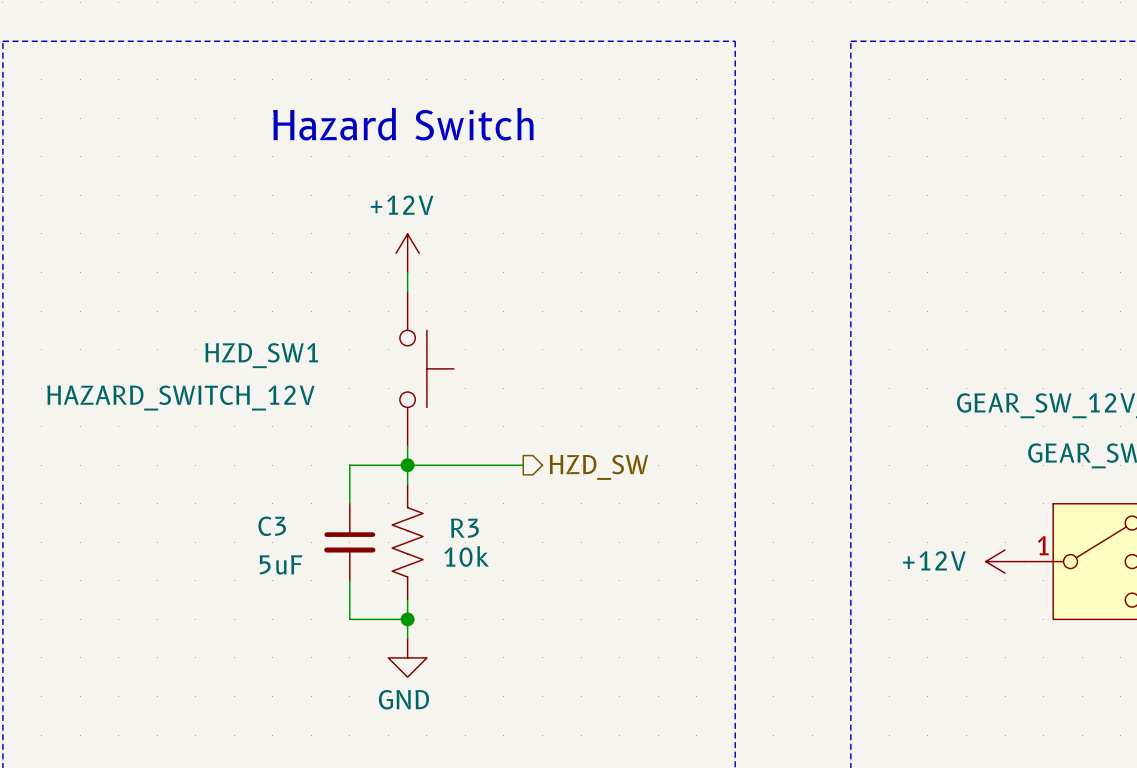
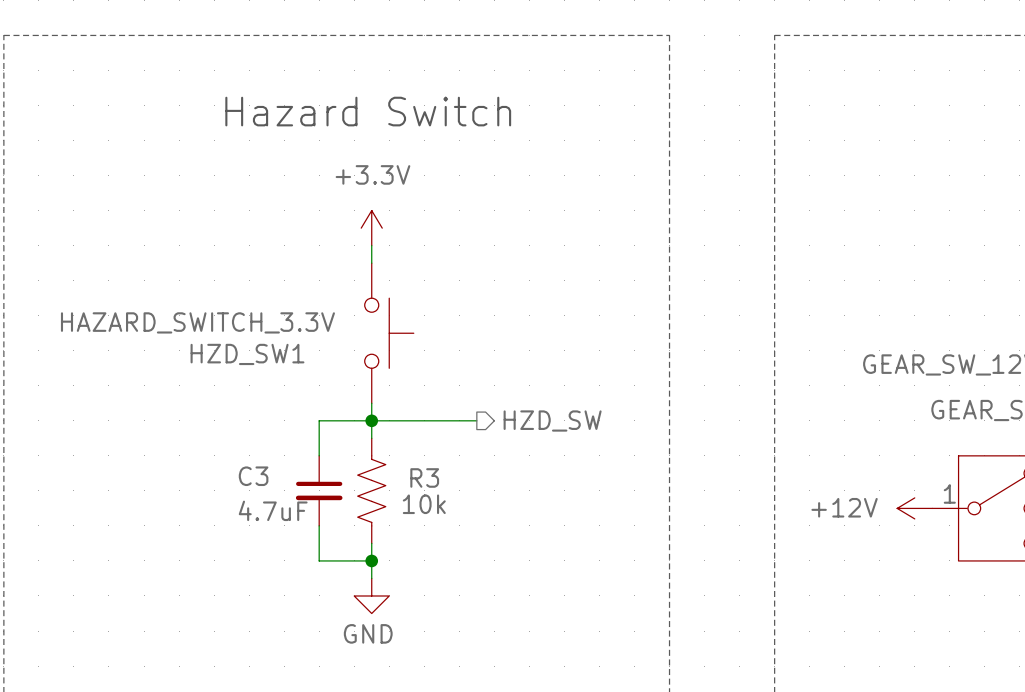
power symbol: +12V (407, 253) -> +3.3V (371, 228)
HZD_SW1 name position: HZD_SW1 (261, 355) -> HZD_SW1 (247, 354)
HZD_SW1 value: HAZARD_SWITCH_12V (180, 398) -> HAZARD_SWITCH_3.3V (197, 322)
C3 value: 5uF (281, 564) -> 4.7uF (273, 510)

